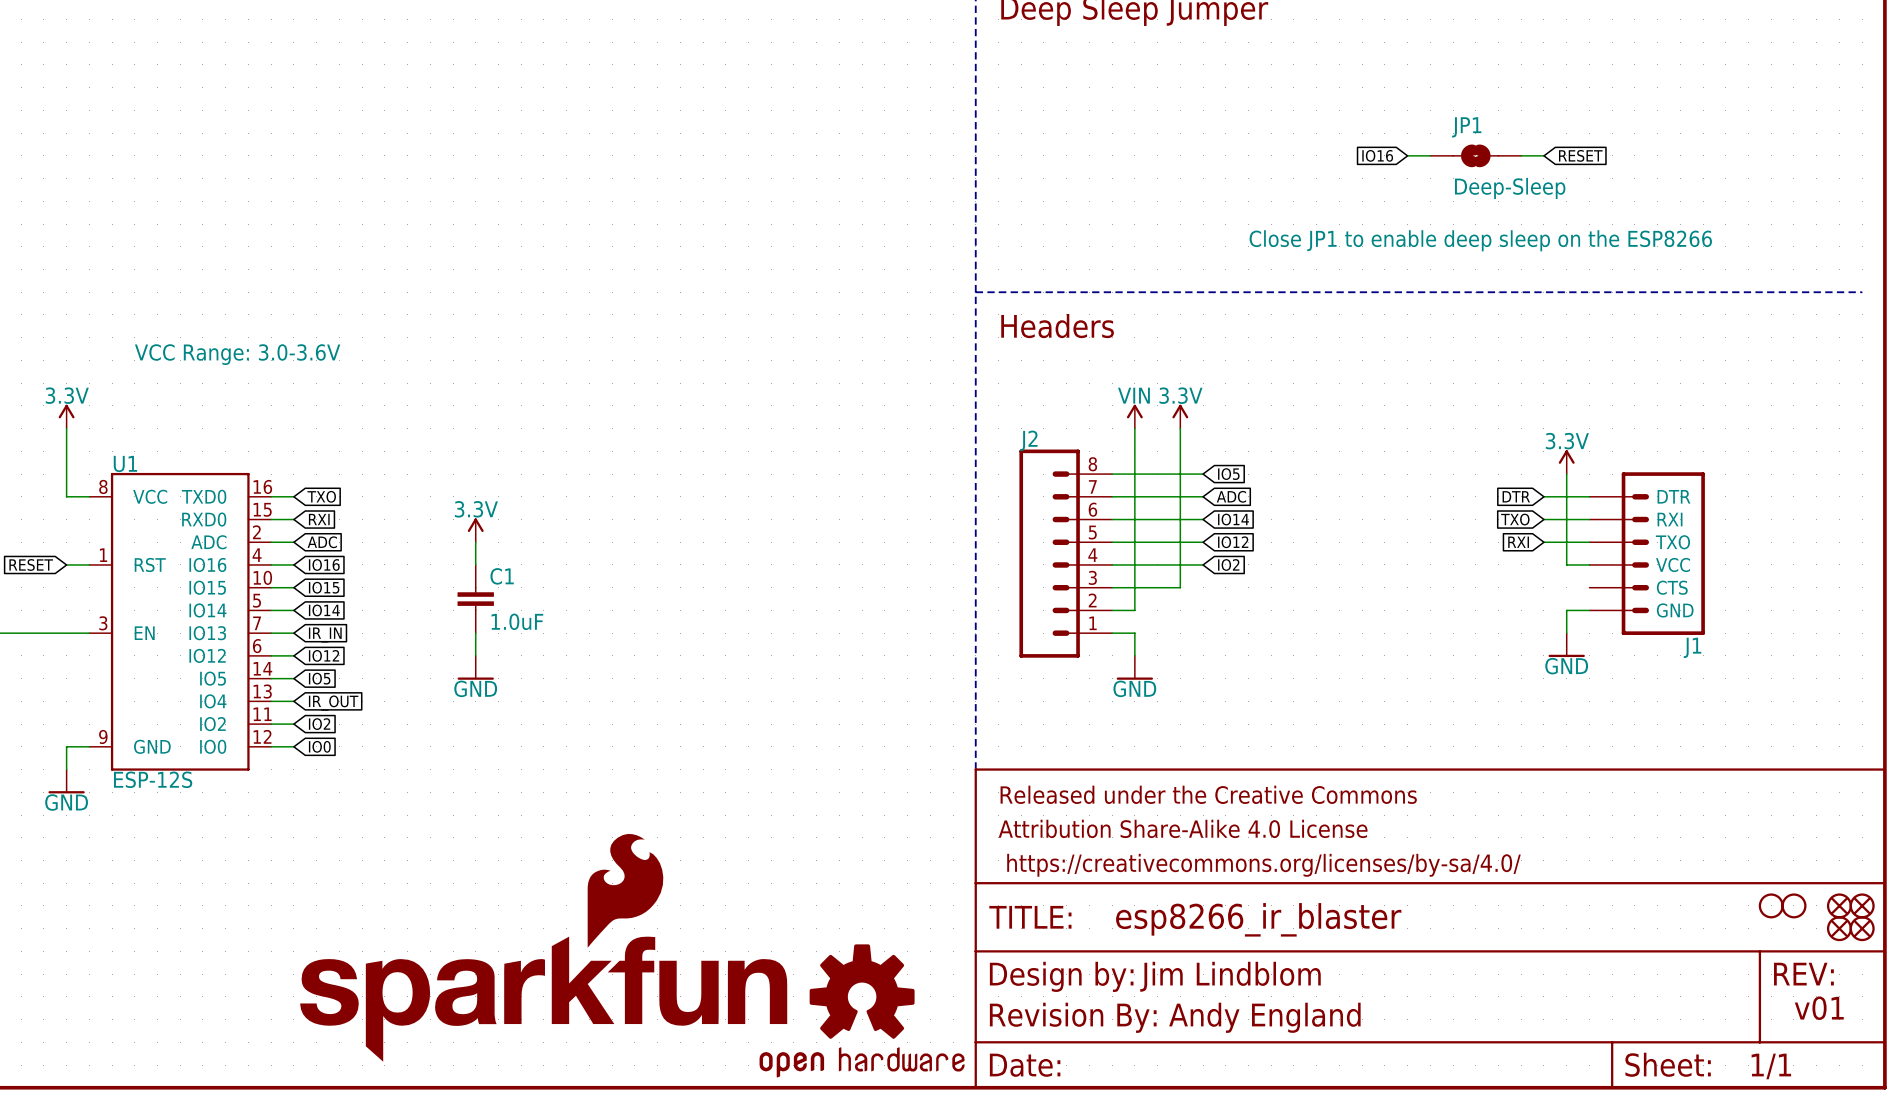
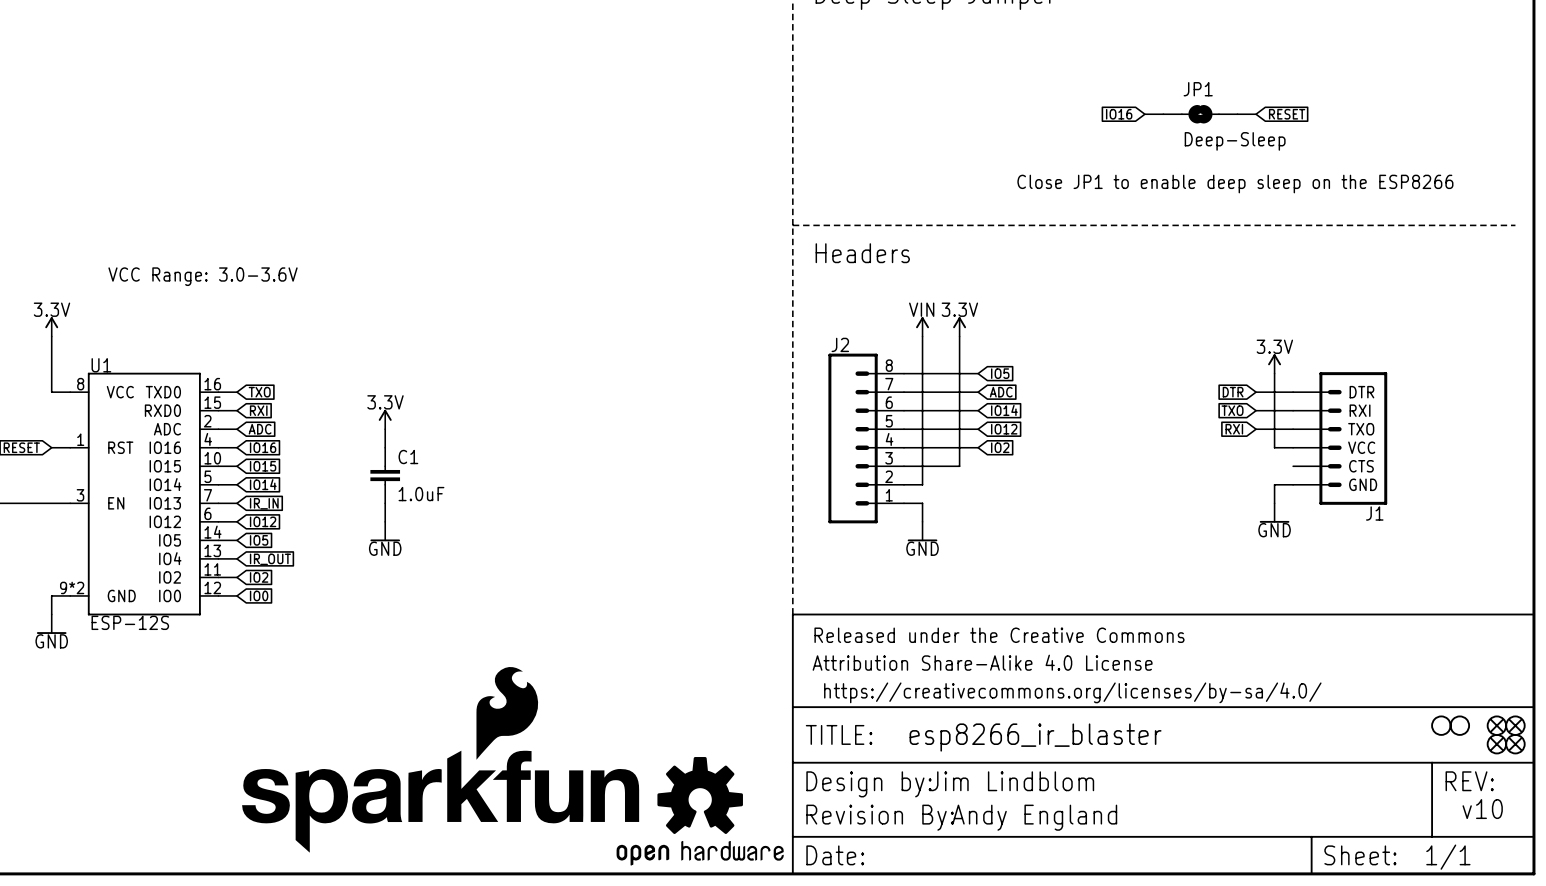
U1 pin number: 9 (103, 736) -> 9*2 (72, 587)
text: v01 (1819, 1008) -> v10 (1482, 809)

